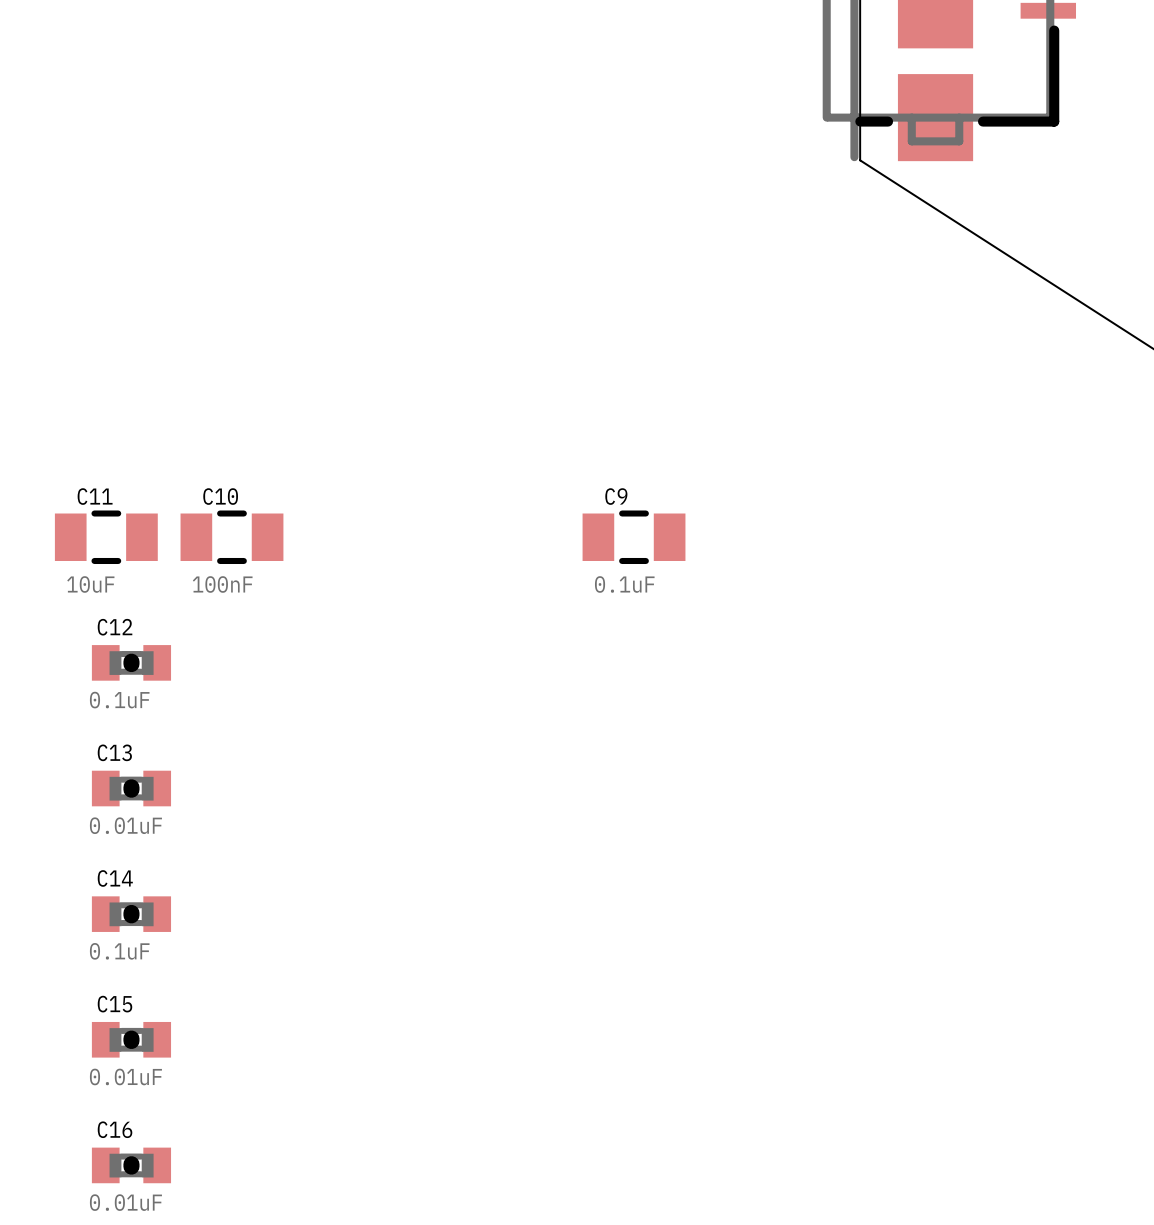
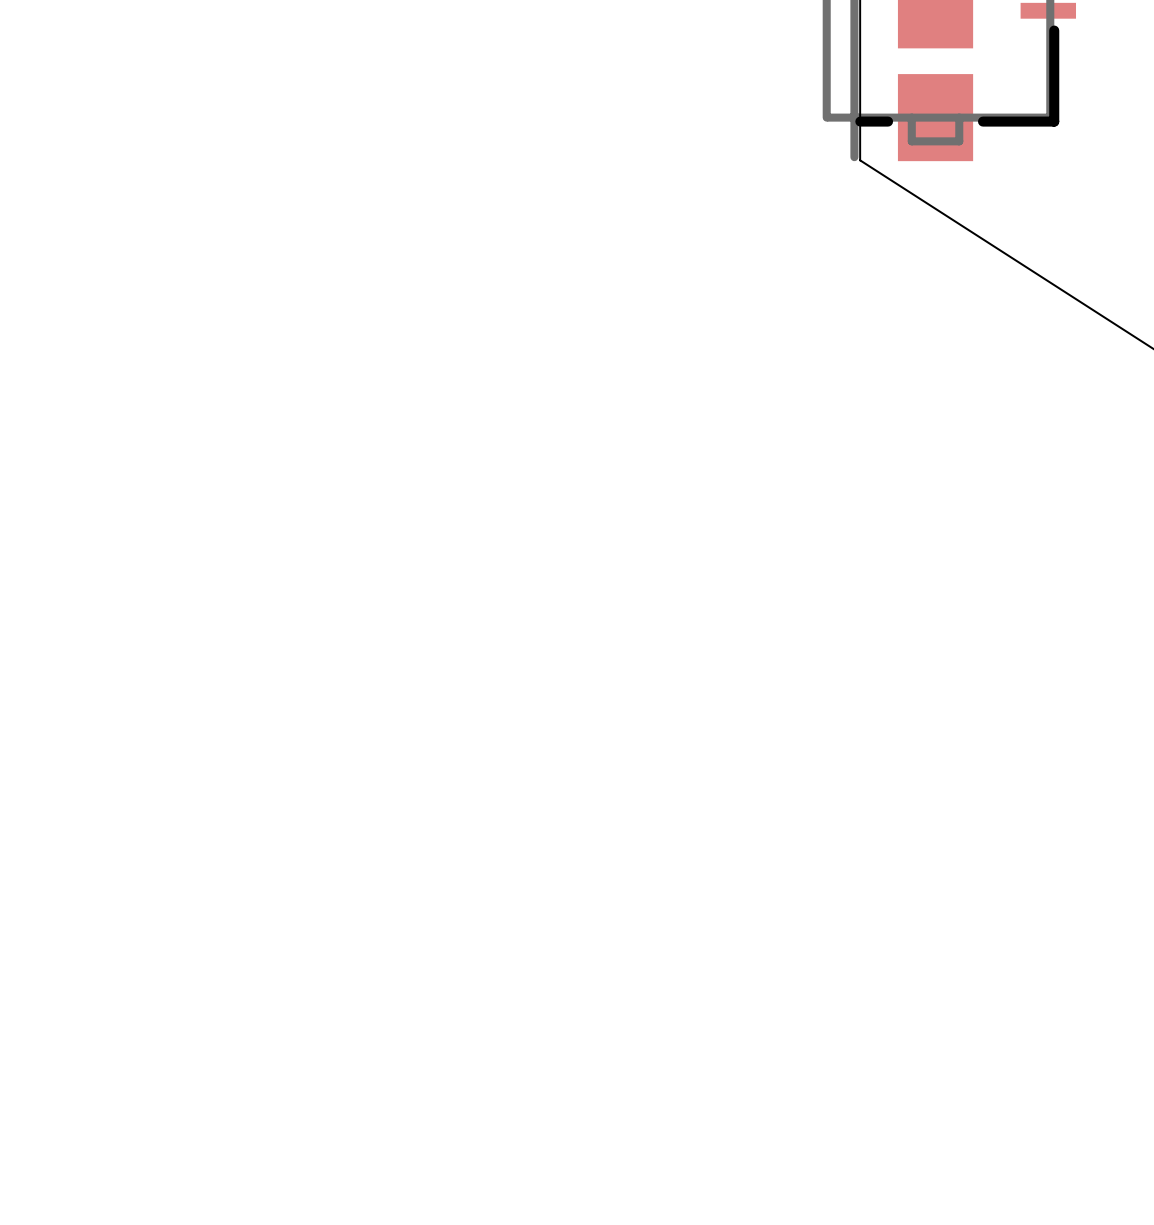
C11: 10uF (106, 537) -> none
C10: 100nF (231, 537) -> none
C9: 0.1uF (634, 537) -> none
C12: 0.1uF (131, 662) -> none
C13: 0.01uF (131, 788) -> none
C14: 0.1uF (131, 914) -> none
C15: 0.01uF (131, 1039) -> none
C16: 0.01uF (131, 1165) -> none

